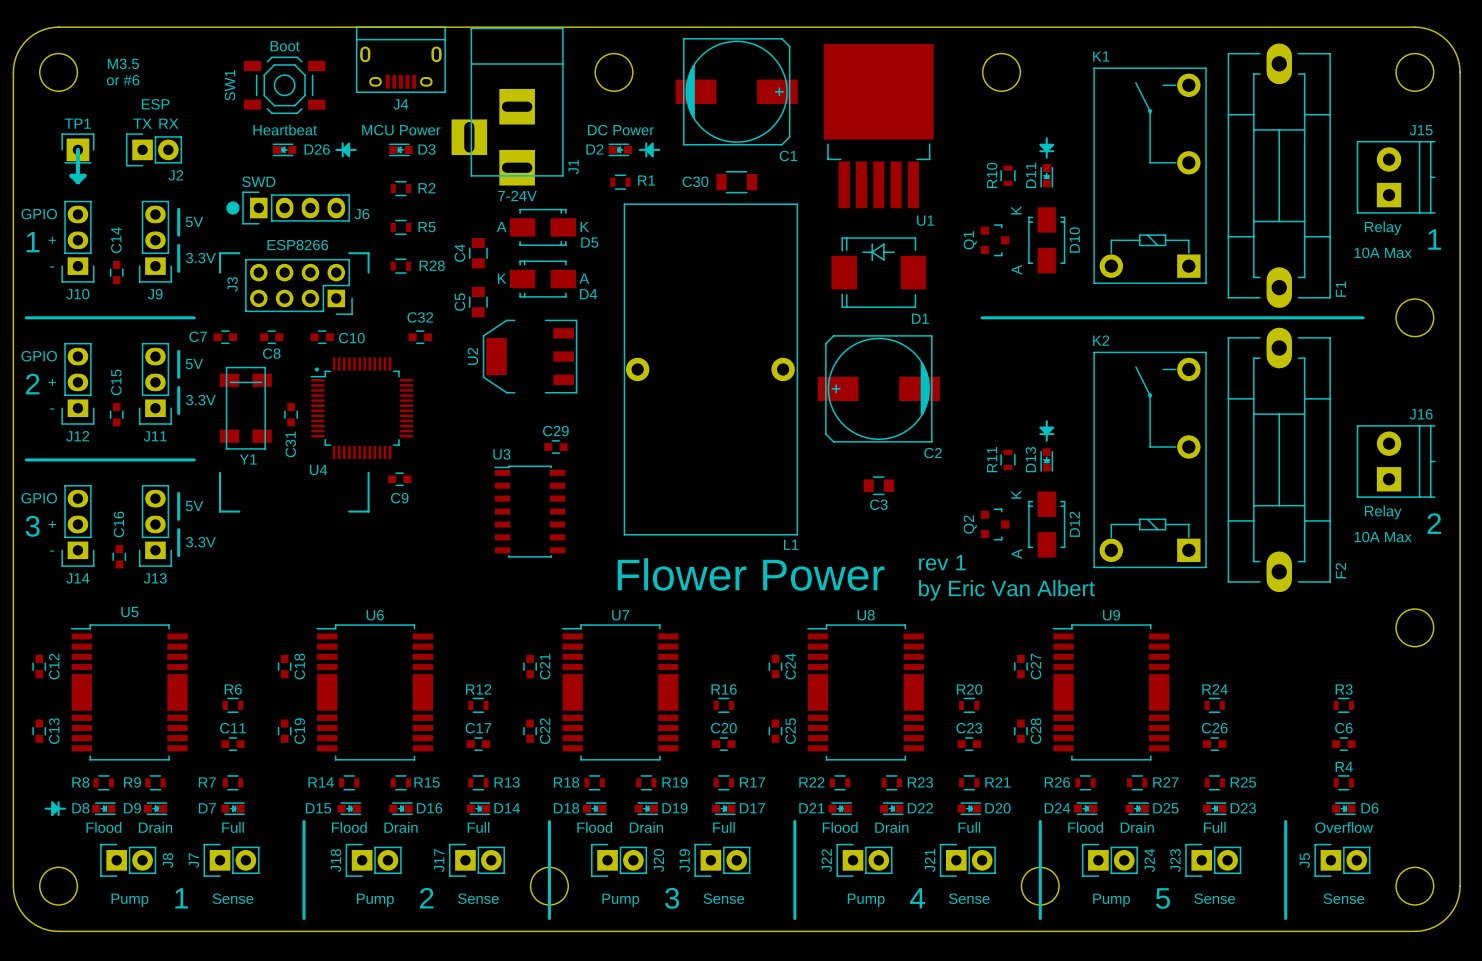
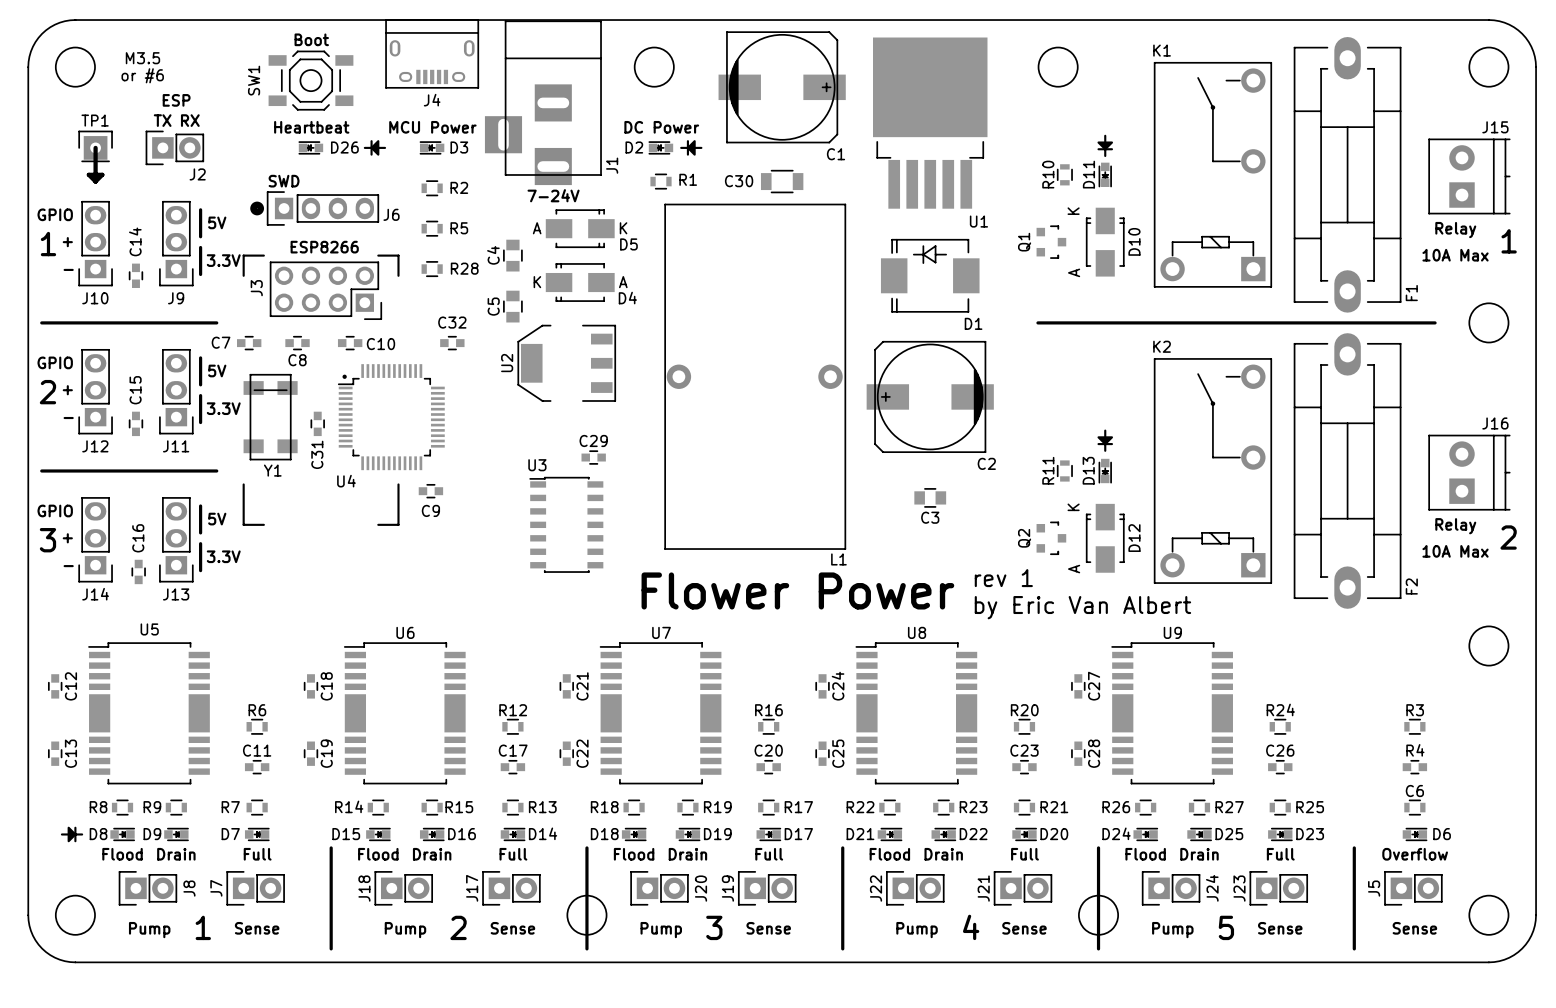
C6 name position: C6 (1343, 728) -> C6 (1414, 791)
R4 name position: R4 (1344, 766) -> R4 (1415, 750)

